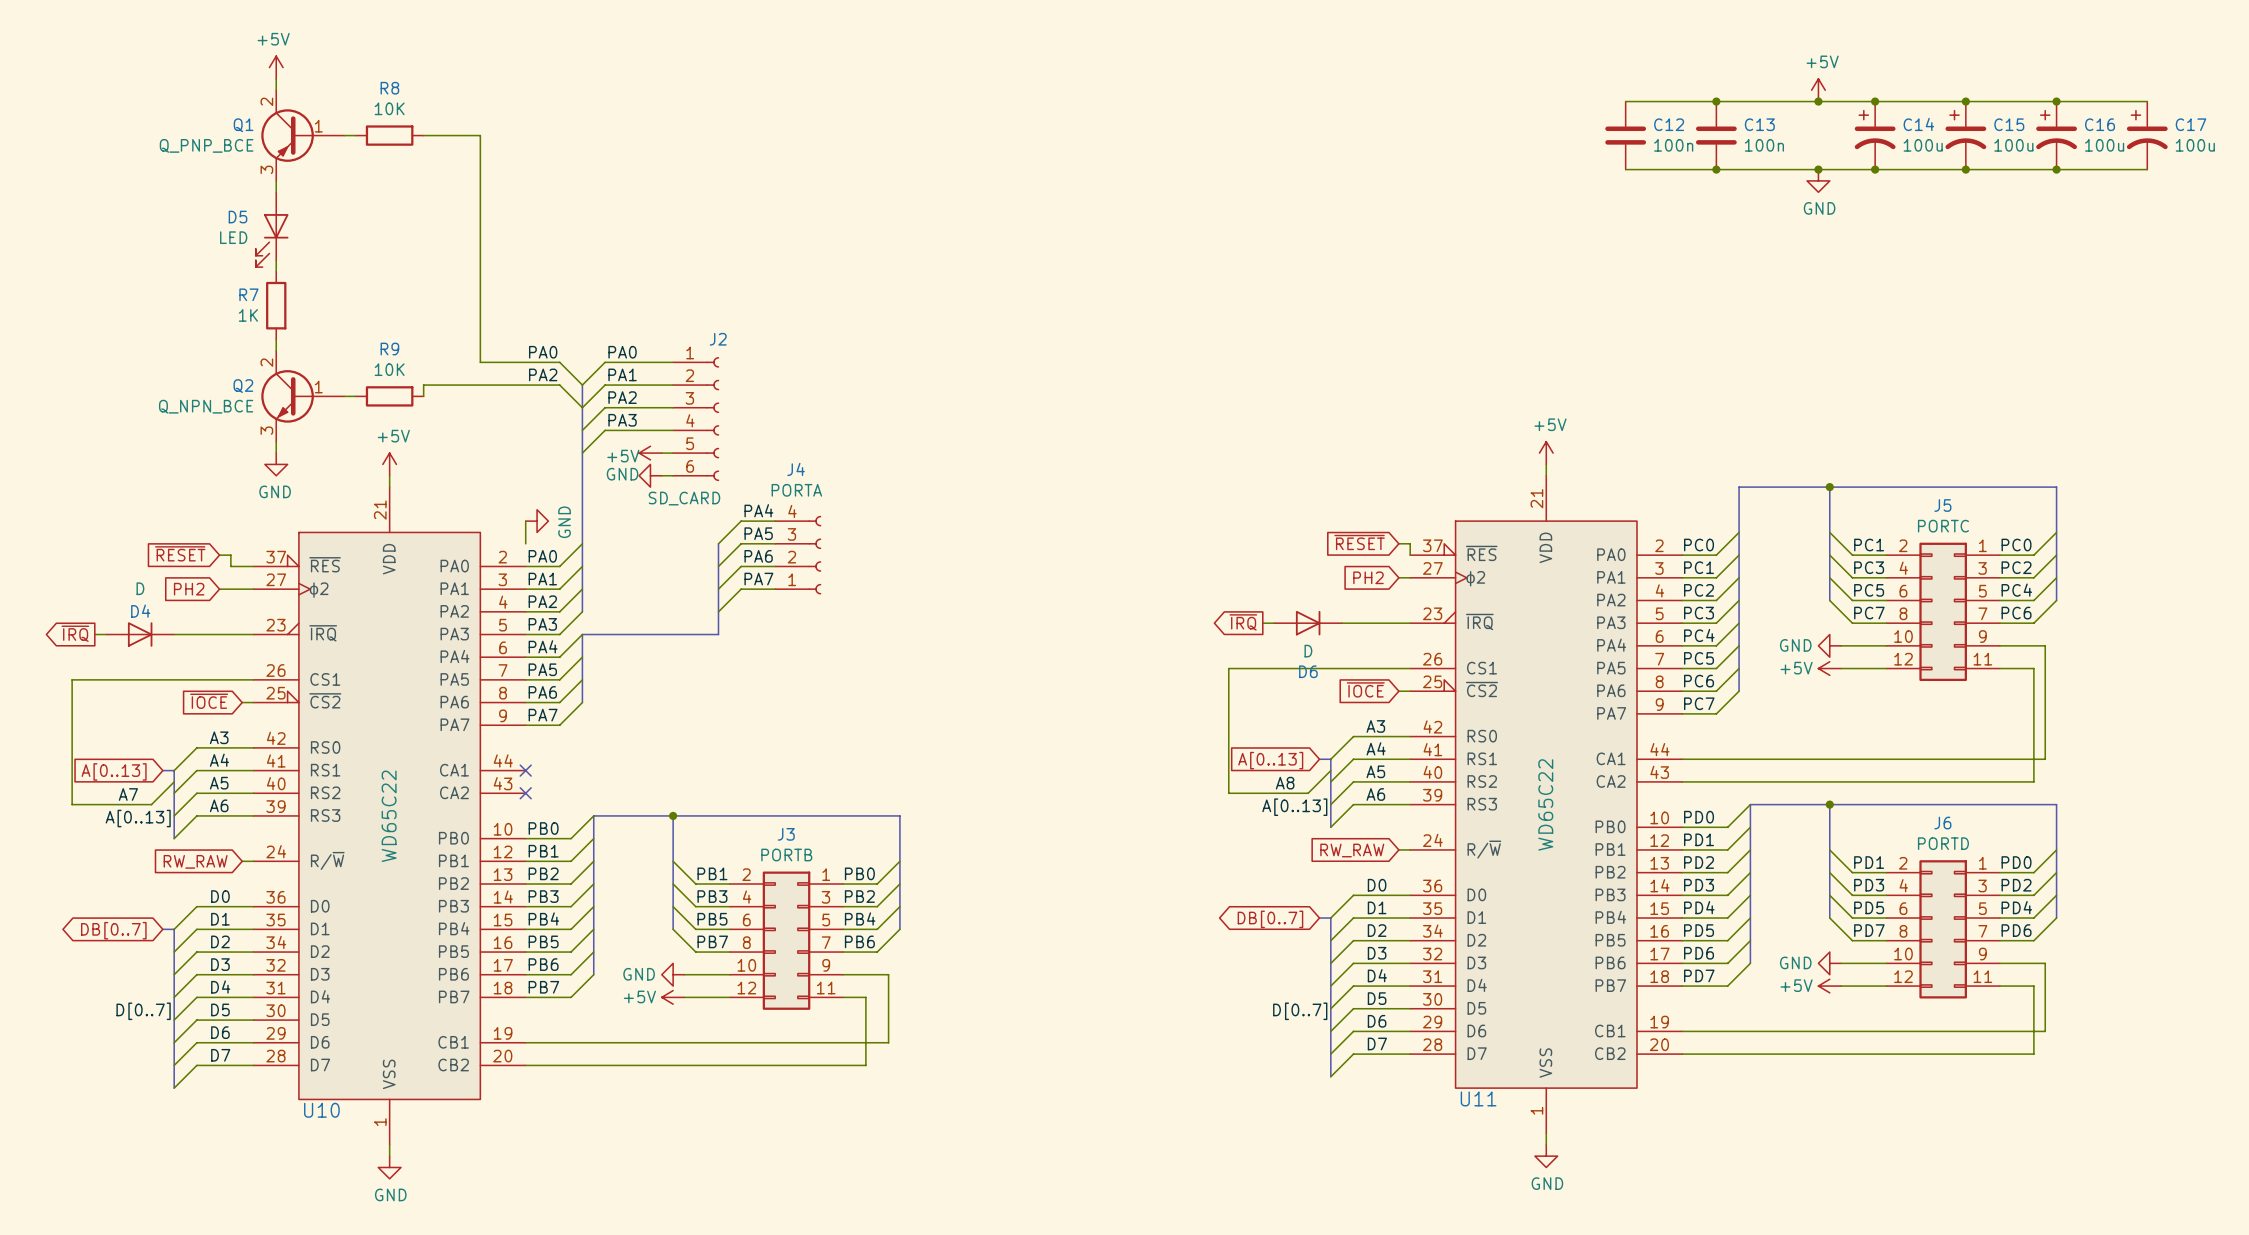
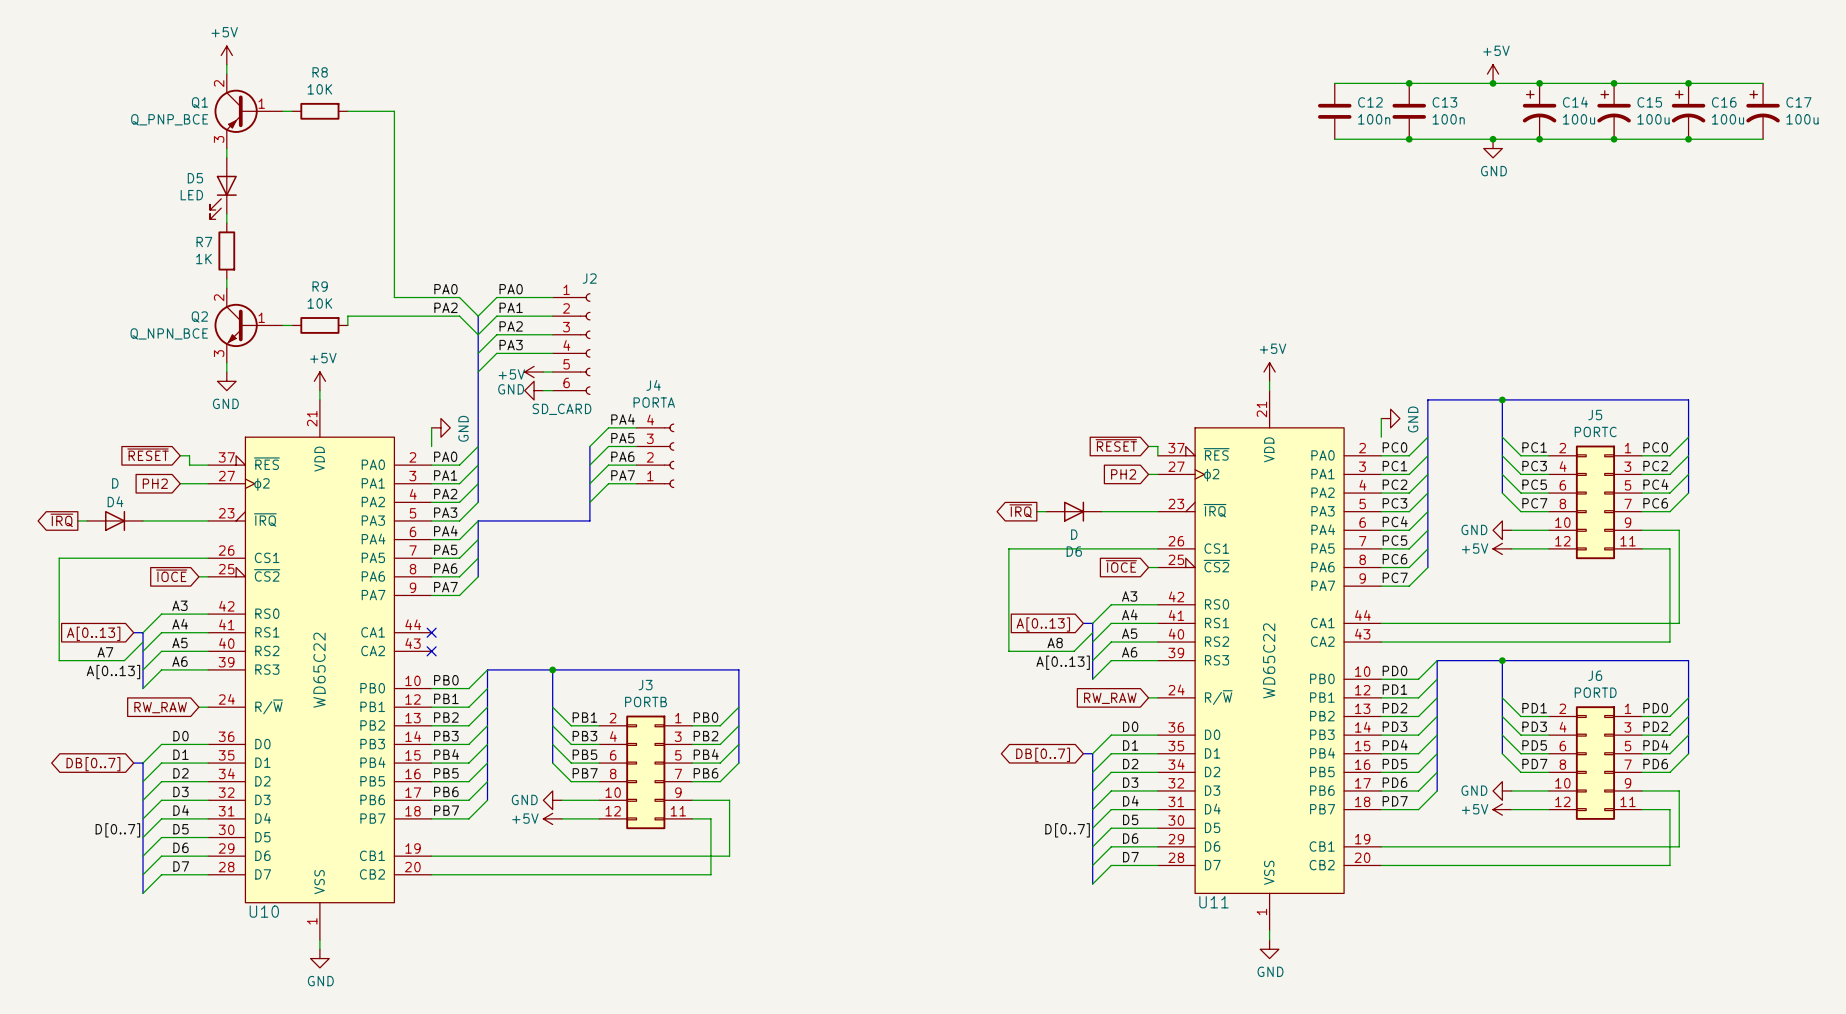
wire: none -> (1381, 418) (1381, 437)
power symbol: none -> GND (1390, 418)

